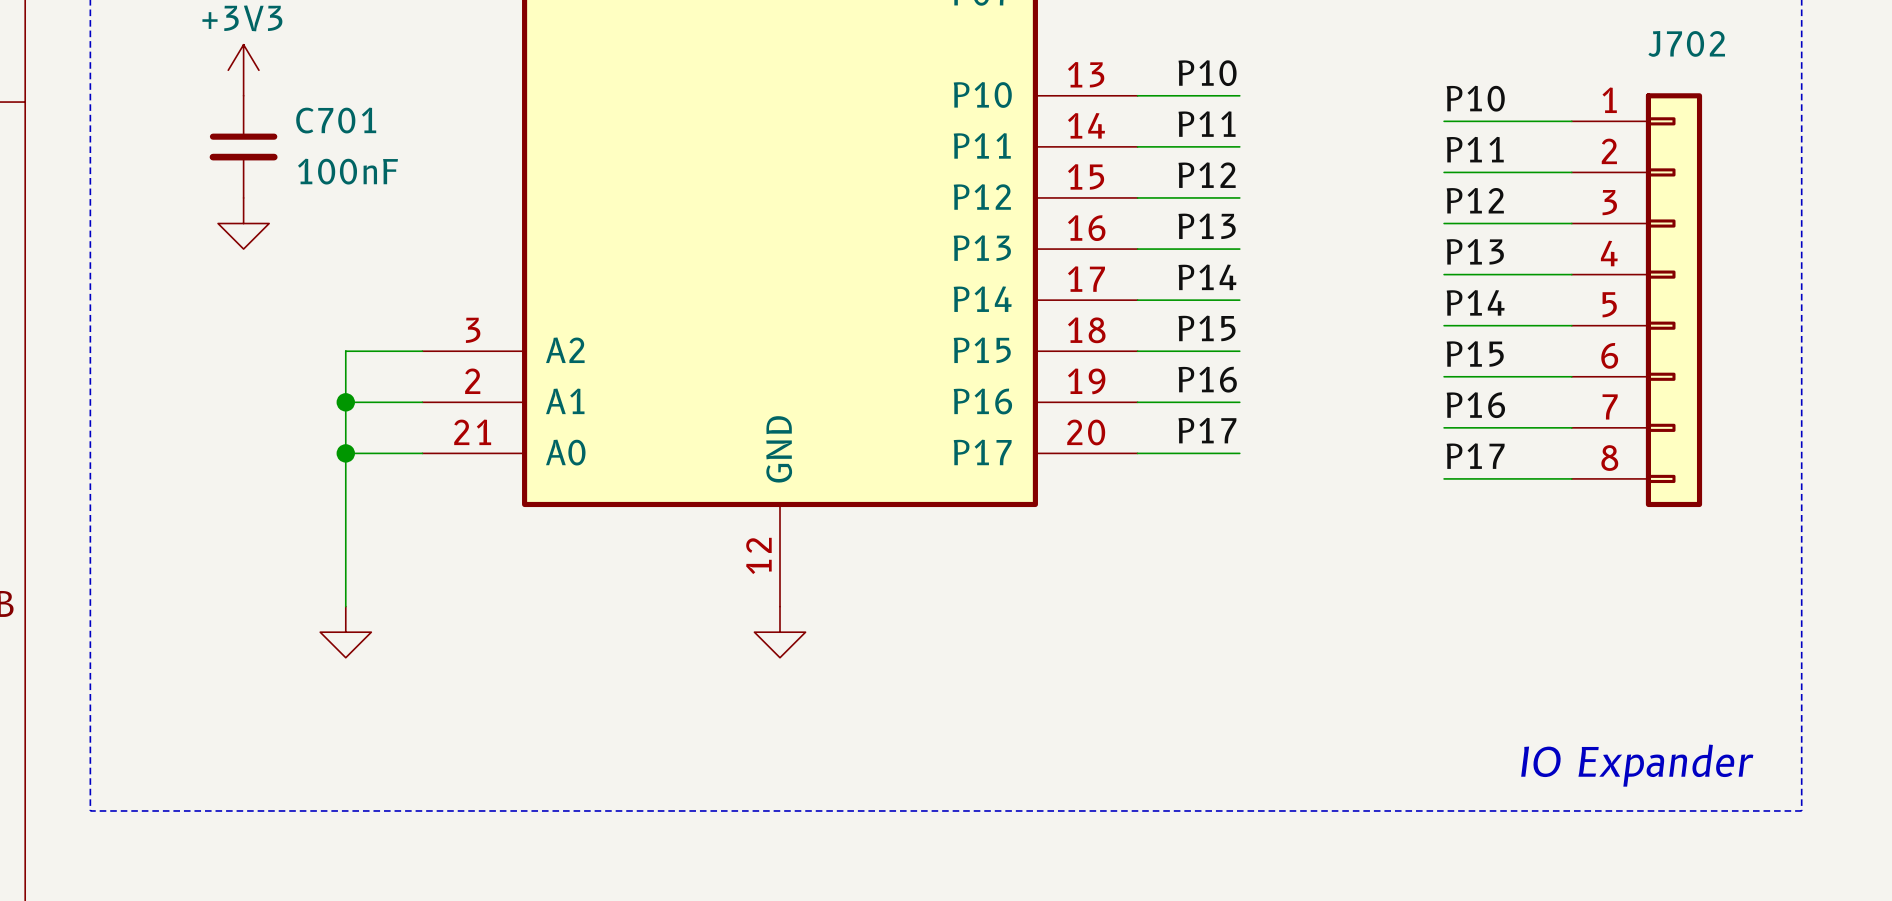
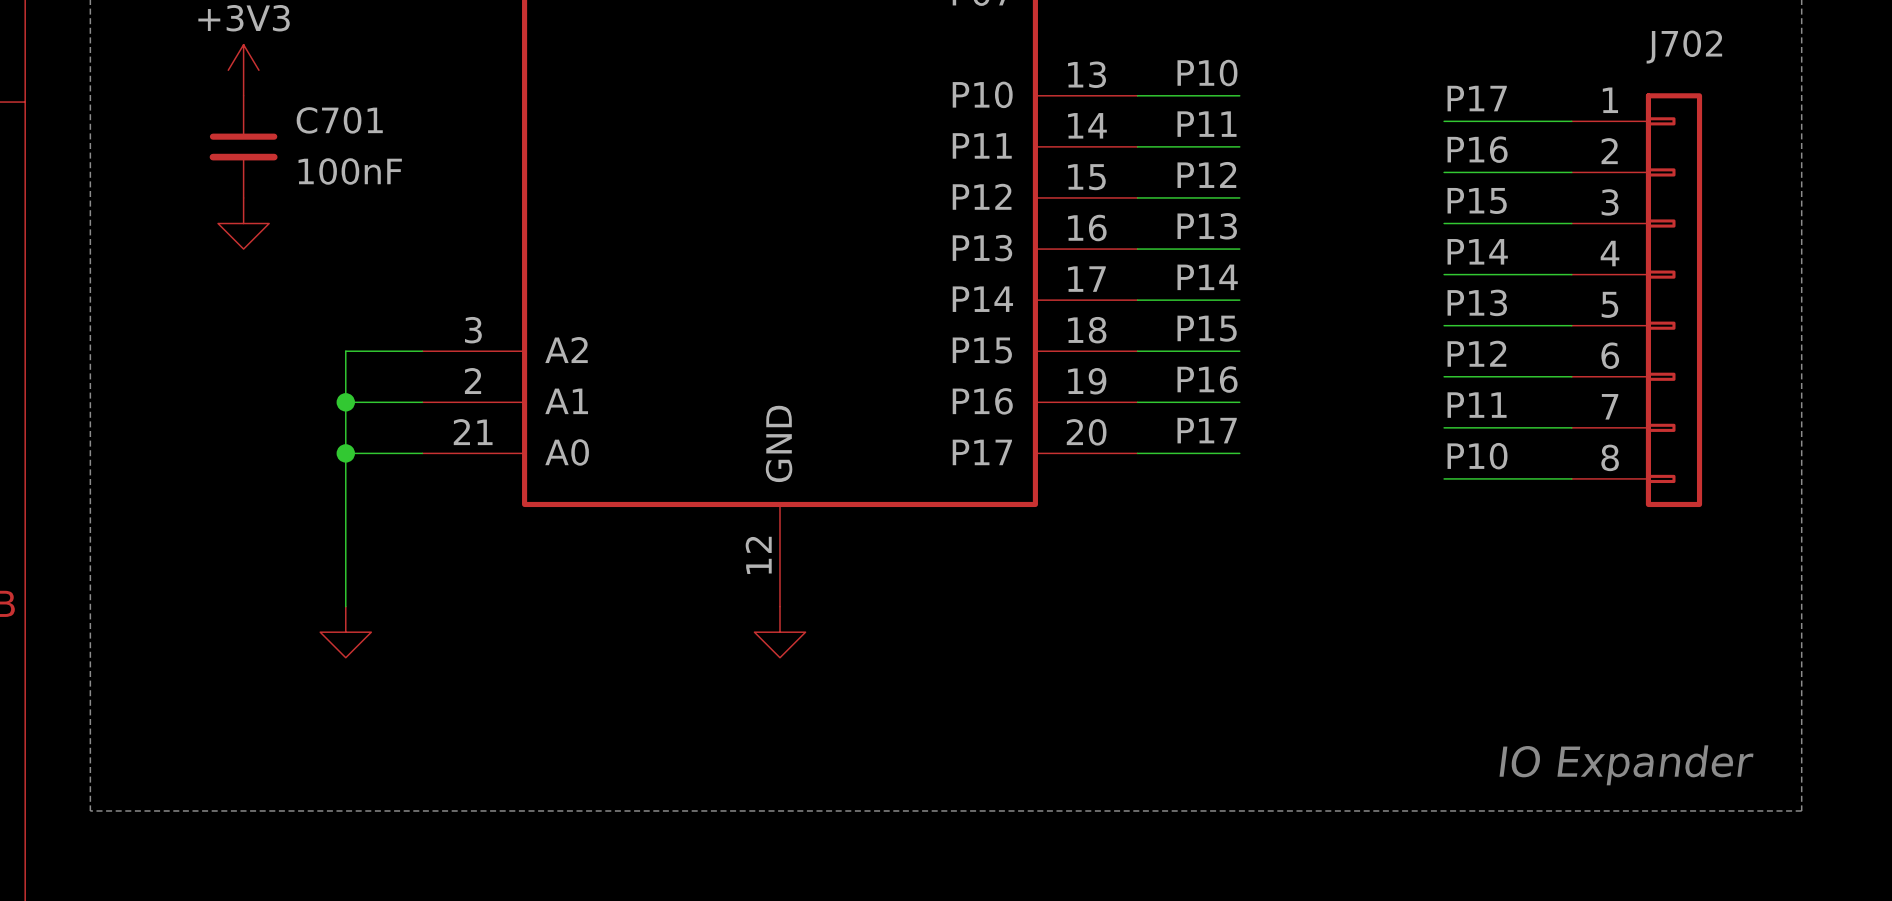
label: P10 (1475, 98) -> P17 (1477, 98)
label: P11 (1475, 149) -> P16 (1477, 149)
label: P12 (1475, 200) -> P15 (1477, 200)
label: P13 (1475, 251) -> P14 (1477, 251)
label: P14 (1475, 302) -> P13 (1477, 302)
label: P15 (1475, 353) -> P12 (1476, 353)
label: P16 (1475, 405) -> P11 (1477, 405)
label: P17 (1475, 456) -> P10 (1477, 456)

